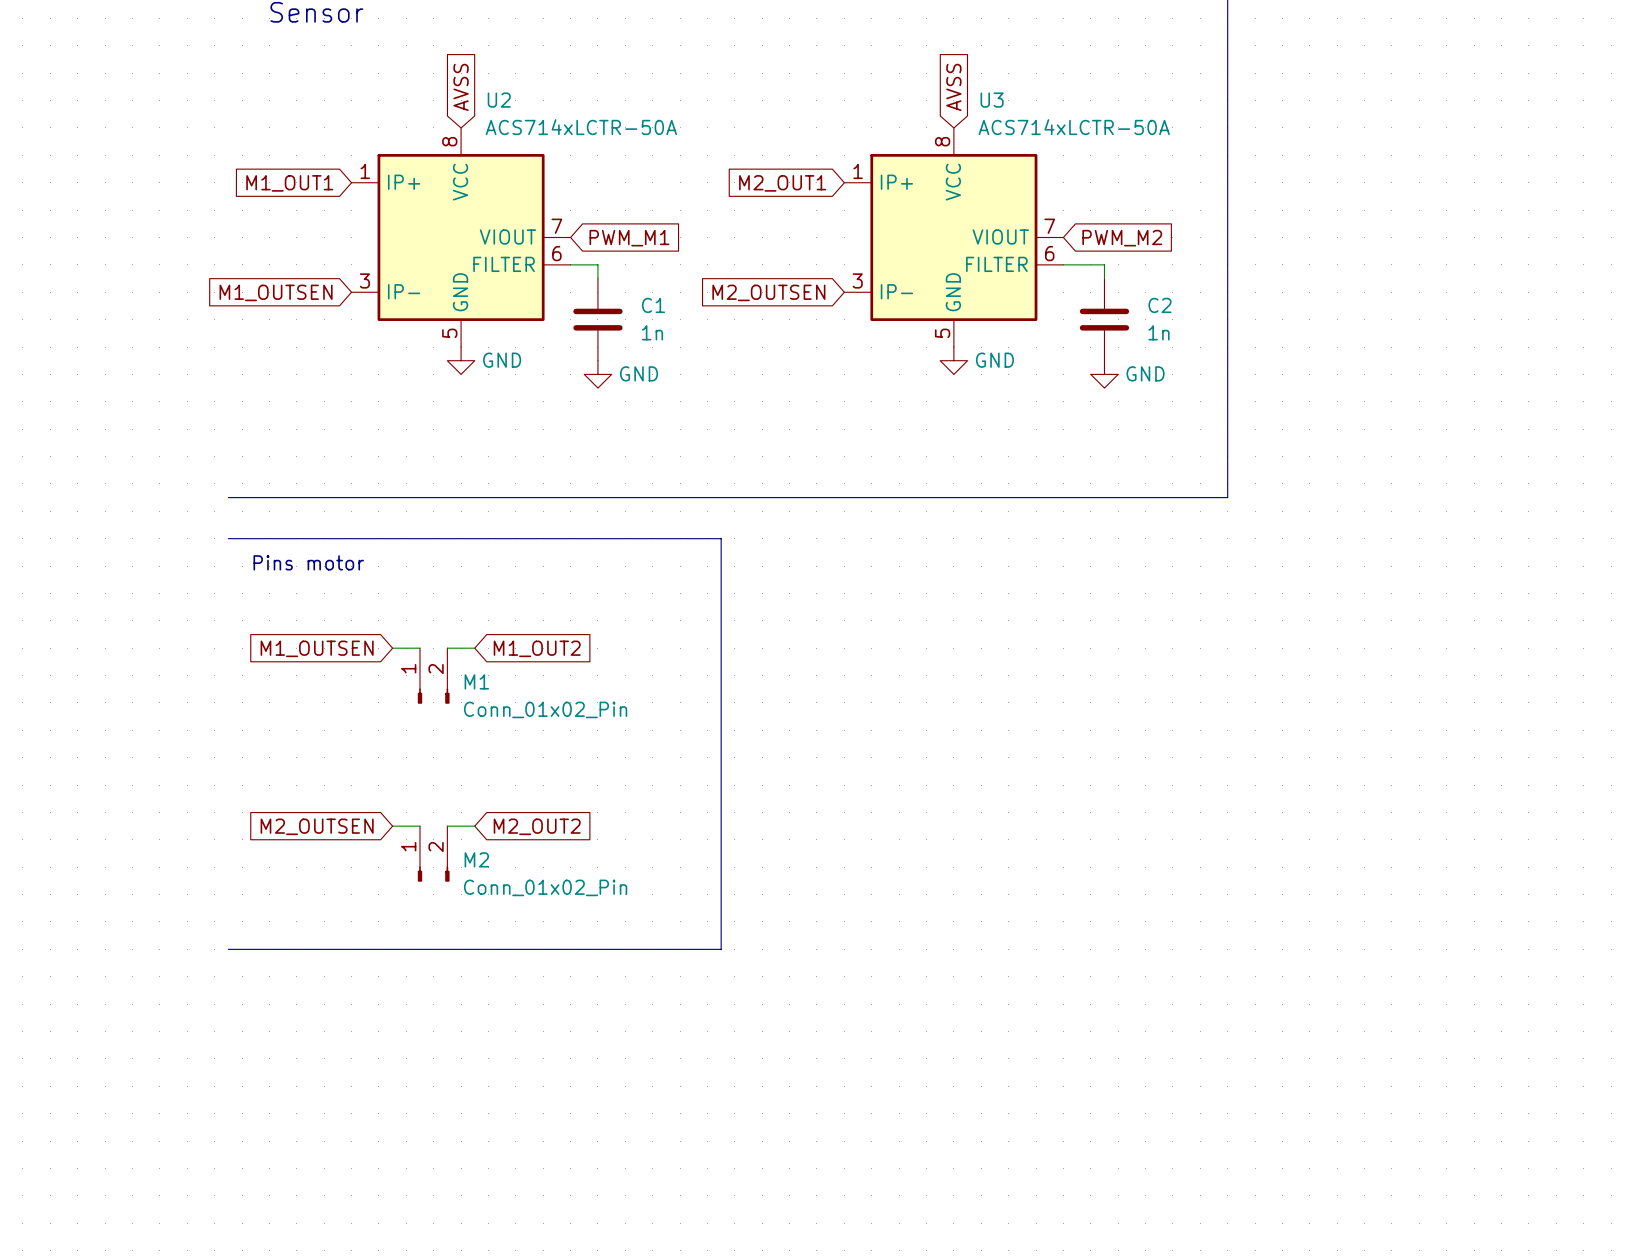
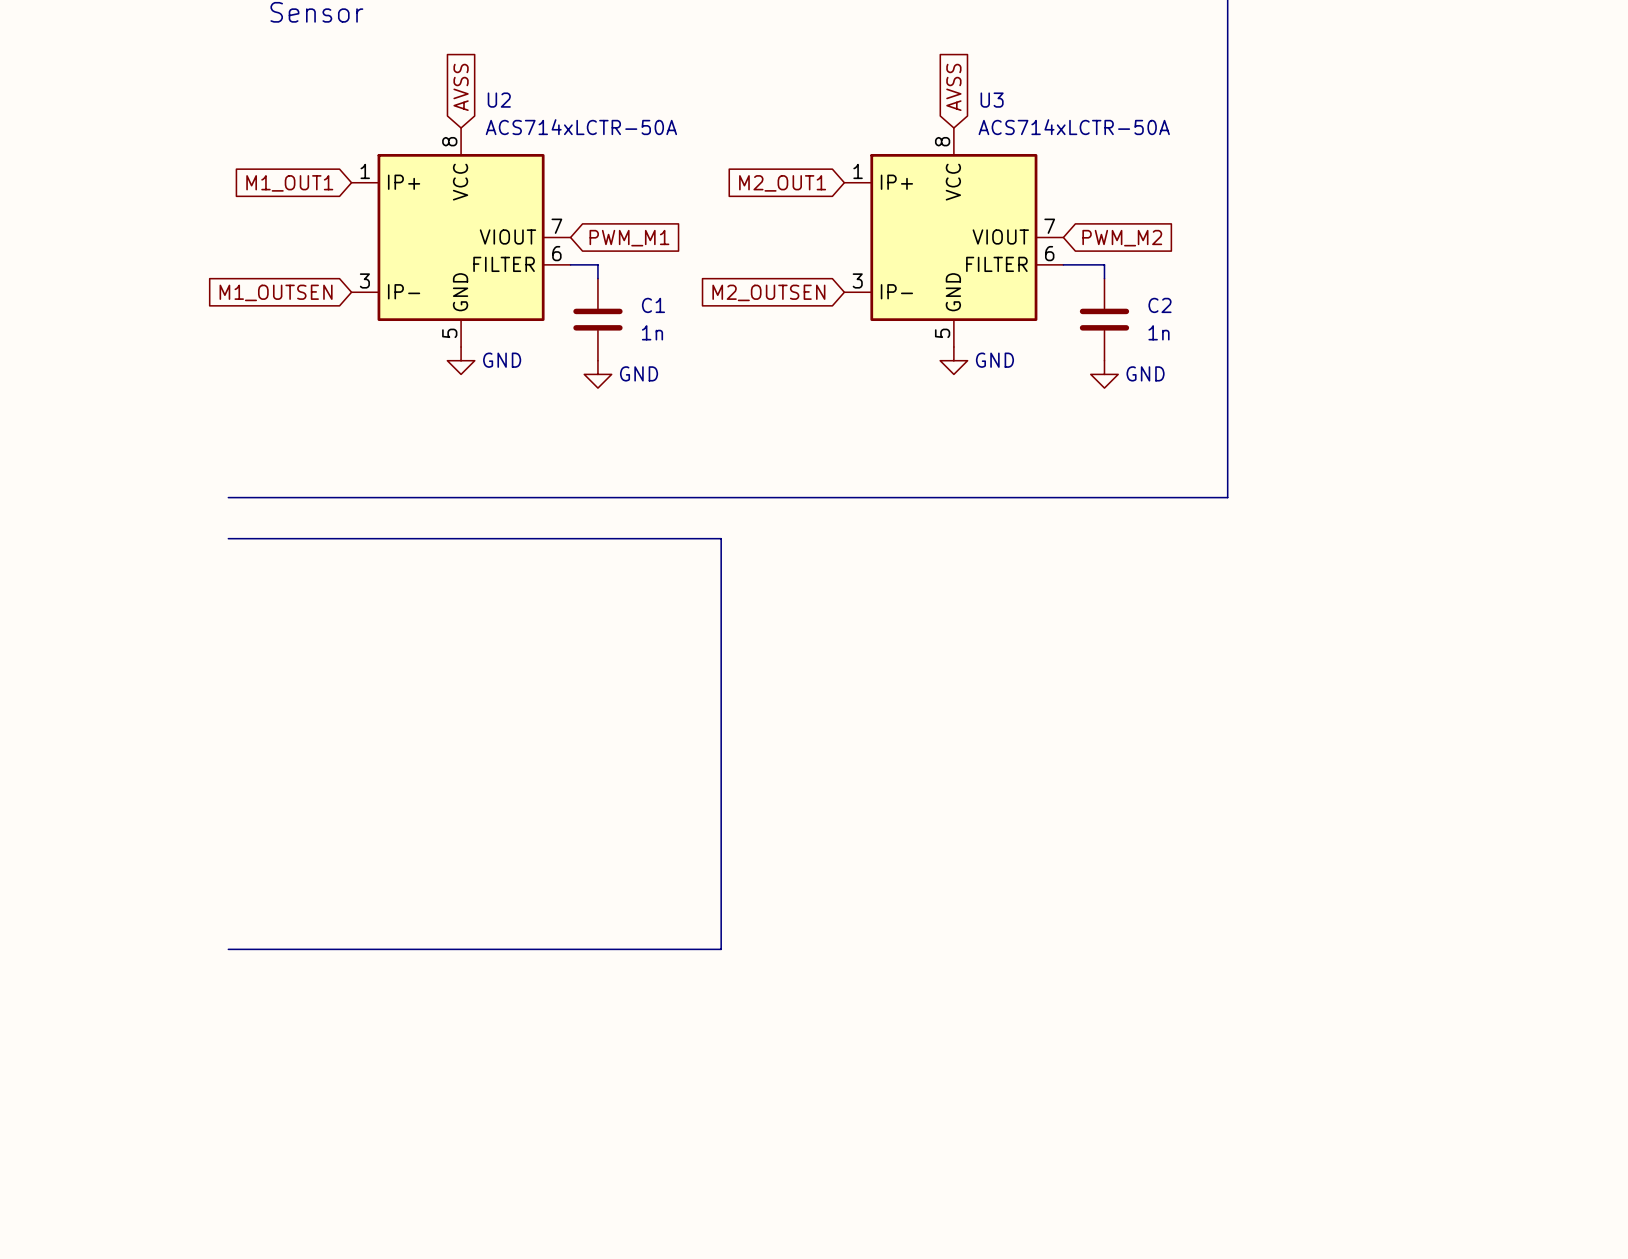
text: Pins motor (308, 562) -> none
global label: M1_OUTSEN (317, 648) -> none
wire: (392, 648) (419, 648) -> none
wire: (447, 648) (474, 648) -> none
global label: M1_OUT2 (537, 648) -> none
M1: Conn_01x02_Pin (433, 675) -> none
global label: M2_OUTSEN (317, 826) -> none
wire: (392, 826) (419, 826) -> none
wire: (447, 826) (474, 826) -> none
global label: M2_OUT2 (537, 826) -> none
M2: Conn_01x02_Pin (433, 853) -> none

